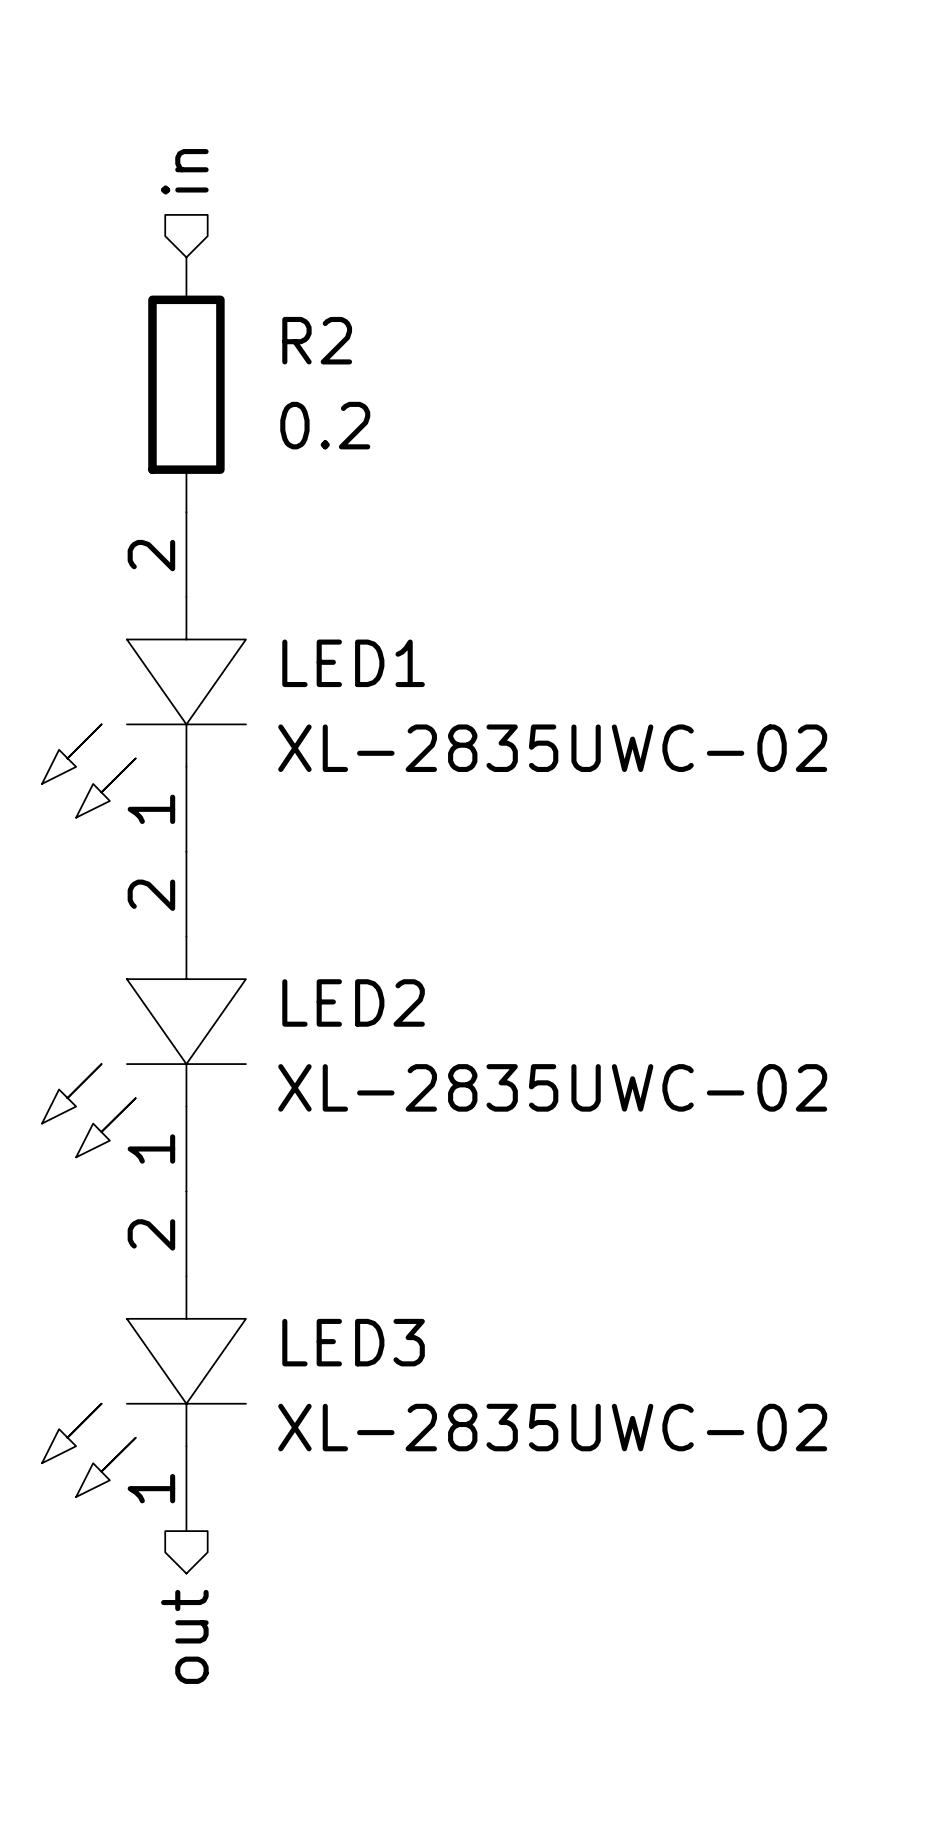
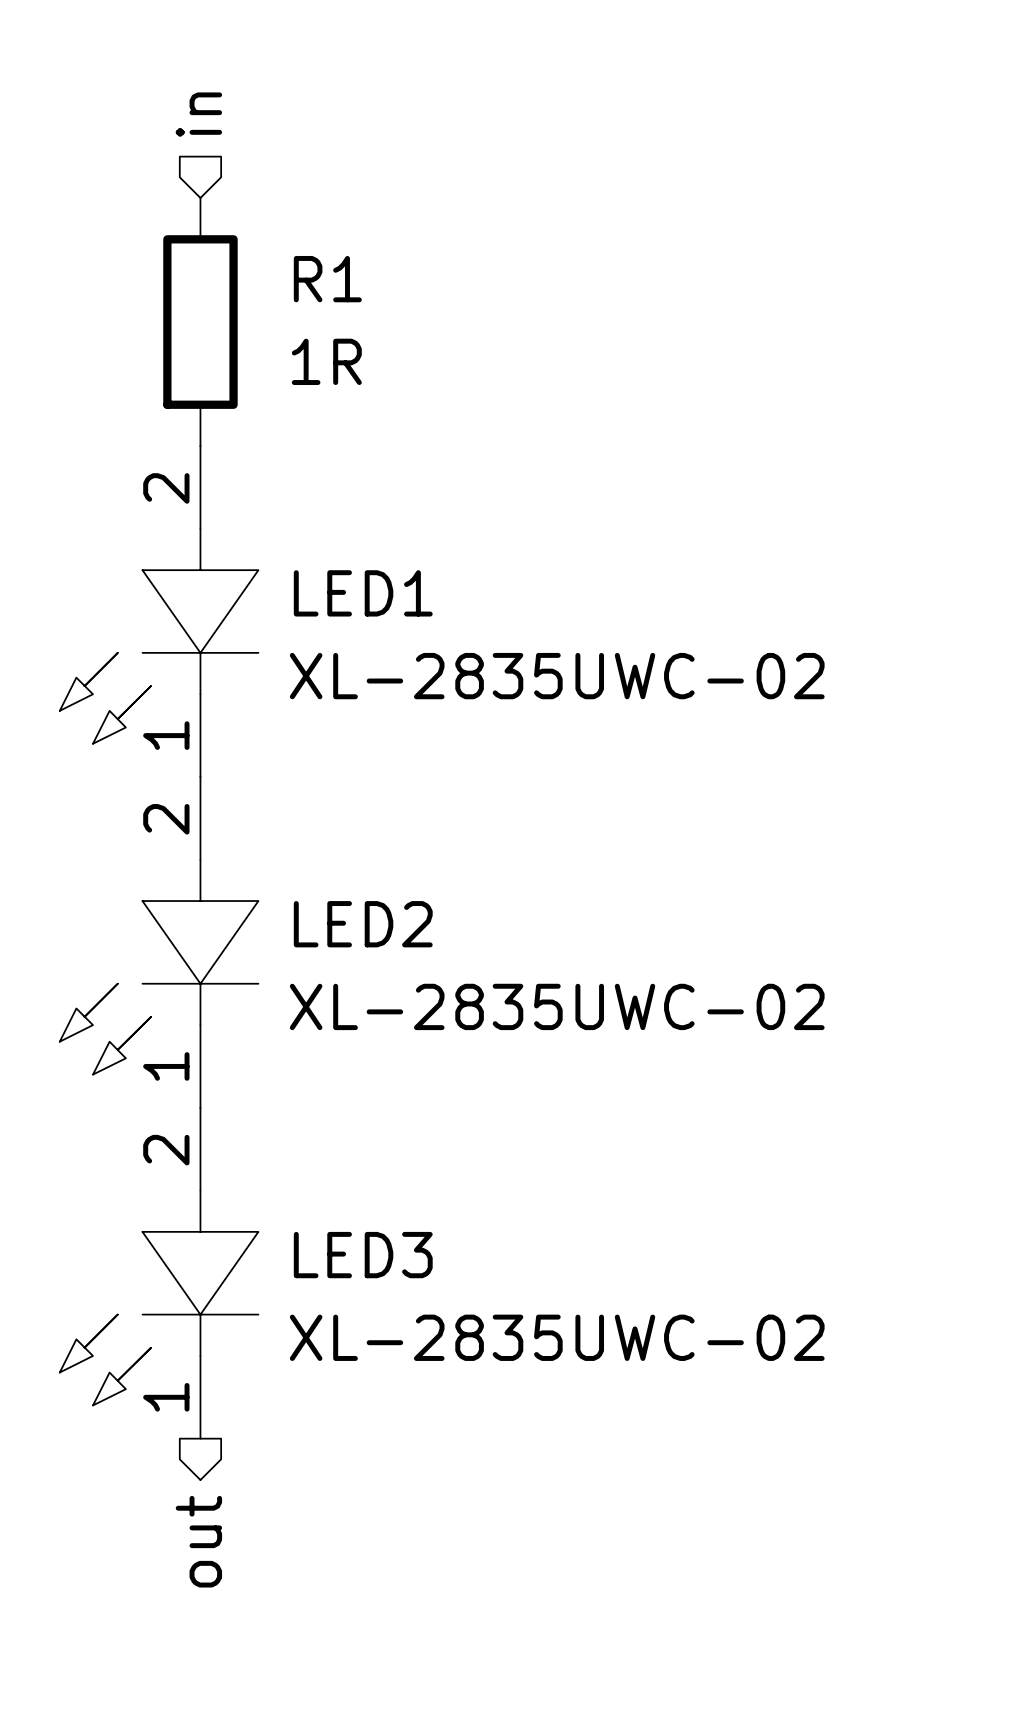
R2 name: R2 (317, 340) -> R1 (327, 279)
R2 value: 0.2 (325, 425) -> 1R (326, 361)

